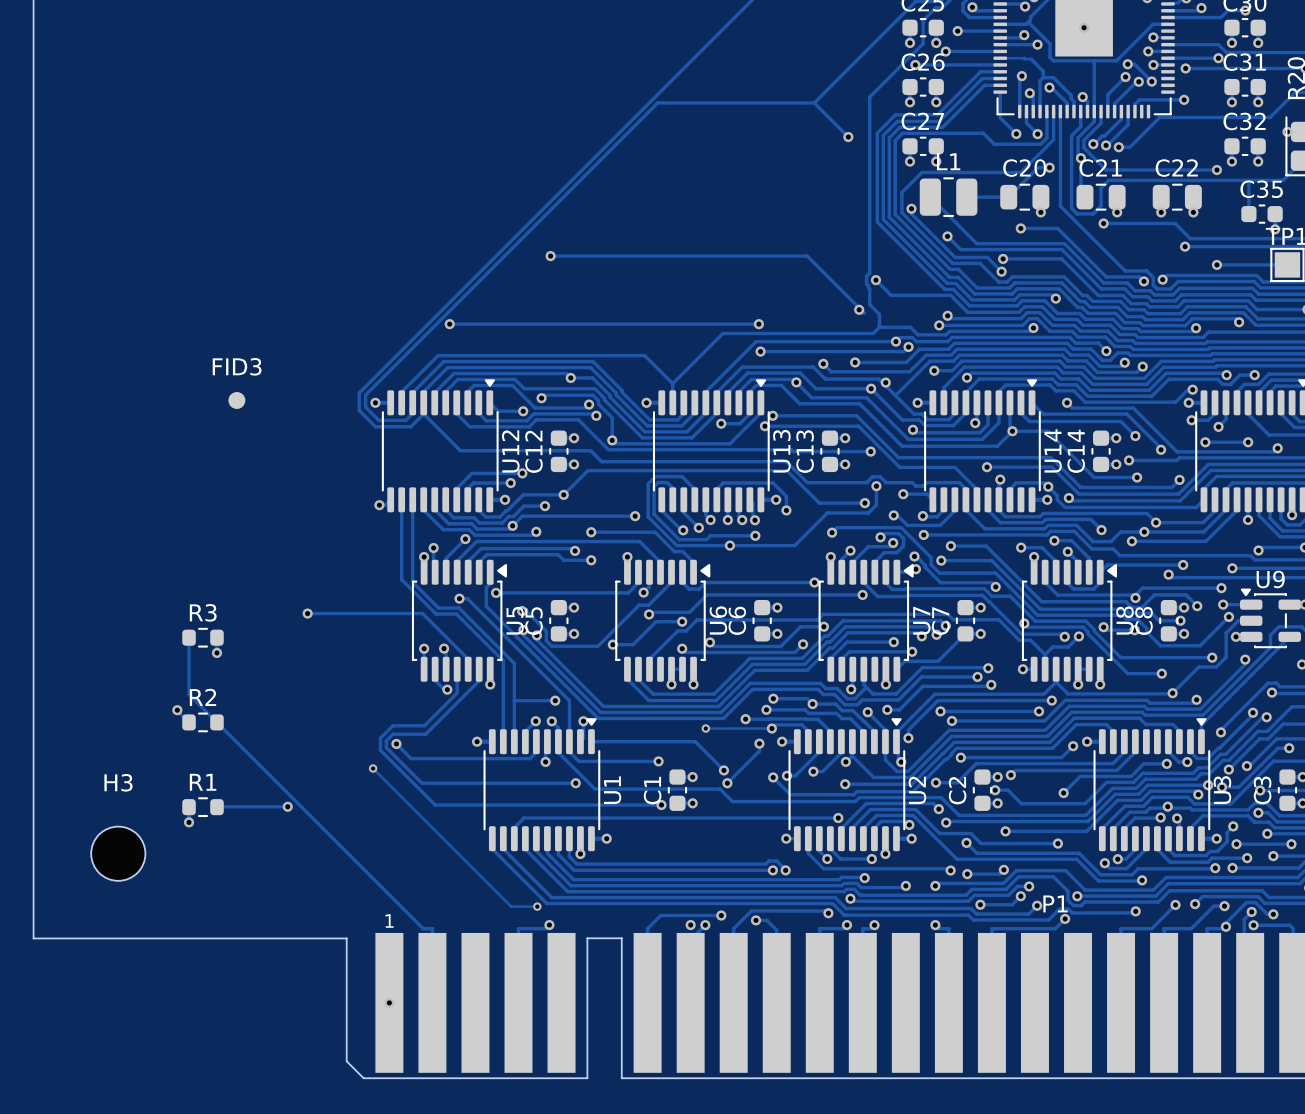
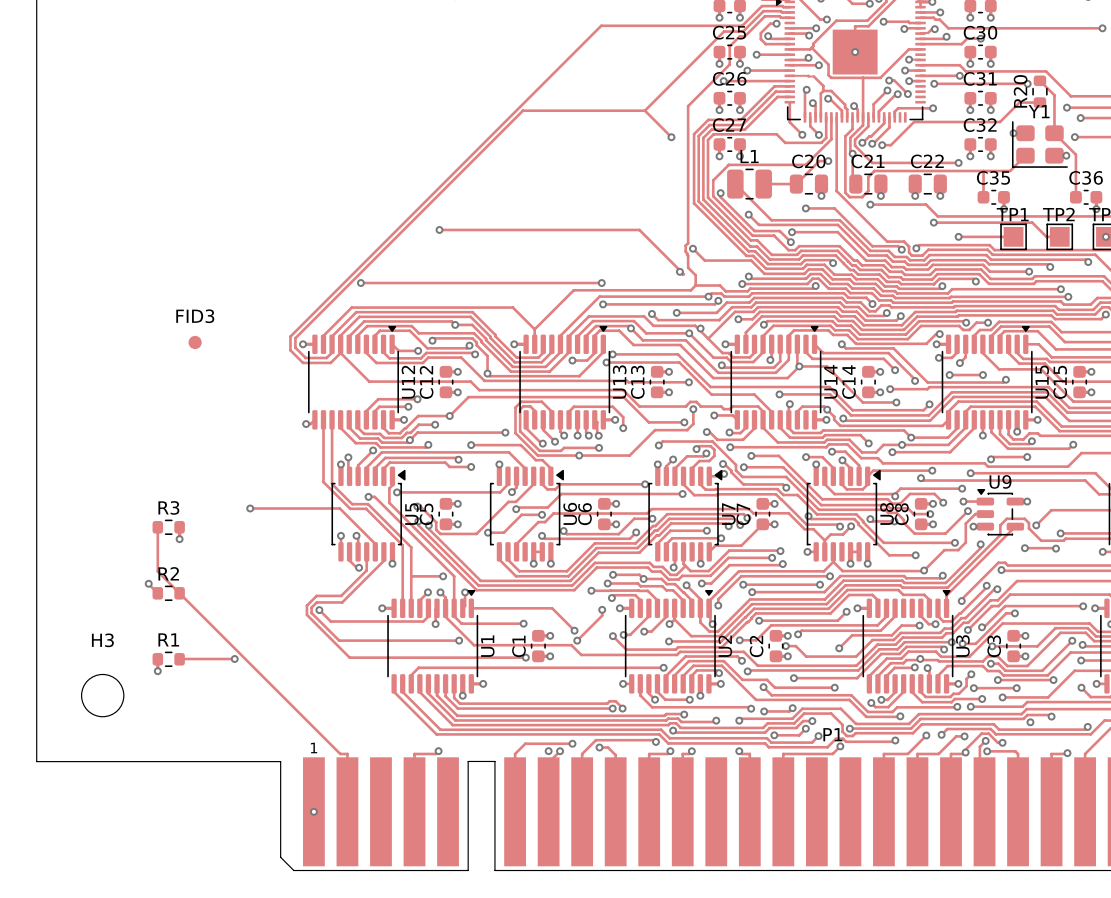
track: (705, 728) (771, 728) -> none
via: (705, 728) -> none
track: (373, 768) (511, 906) (537, 906) -> none
via: (373, 768) -> none
via: (537, 906) -> none

